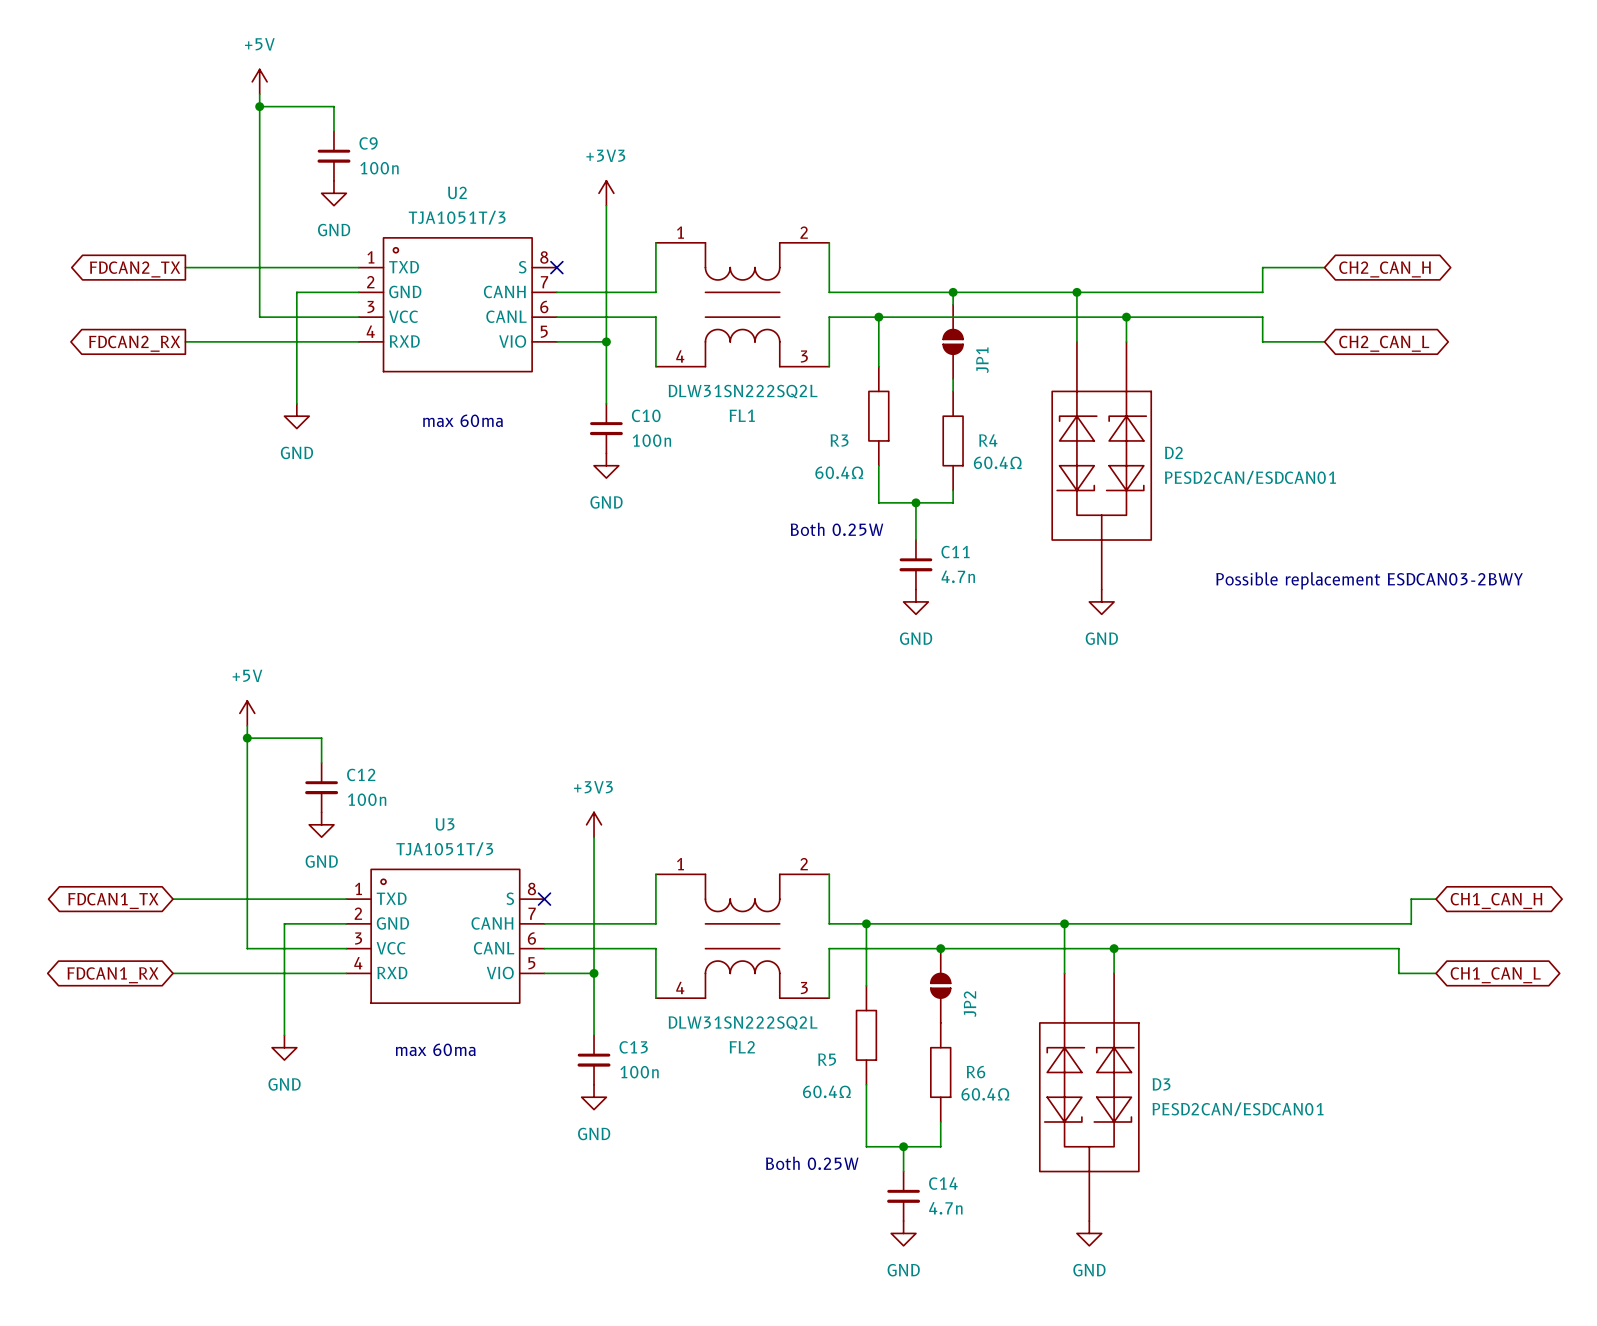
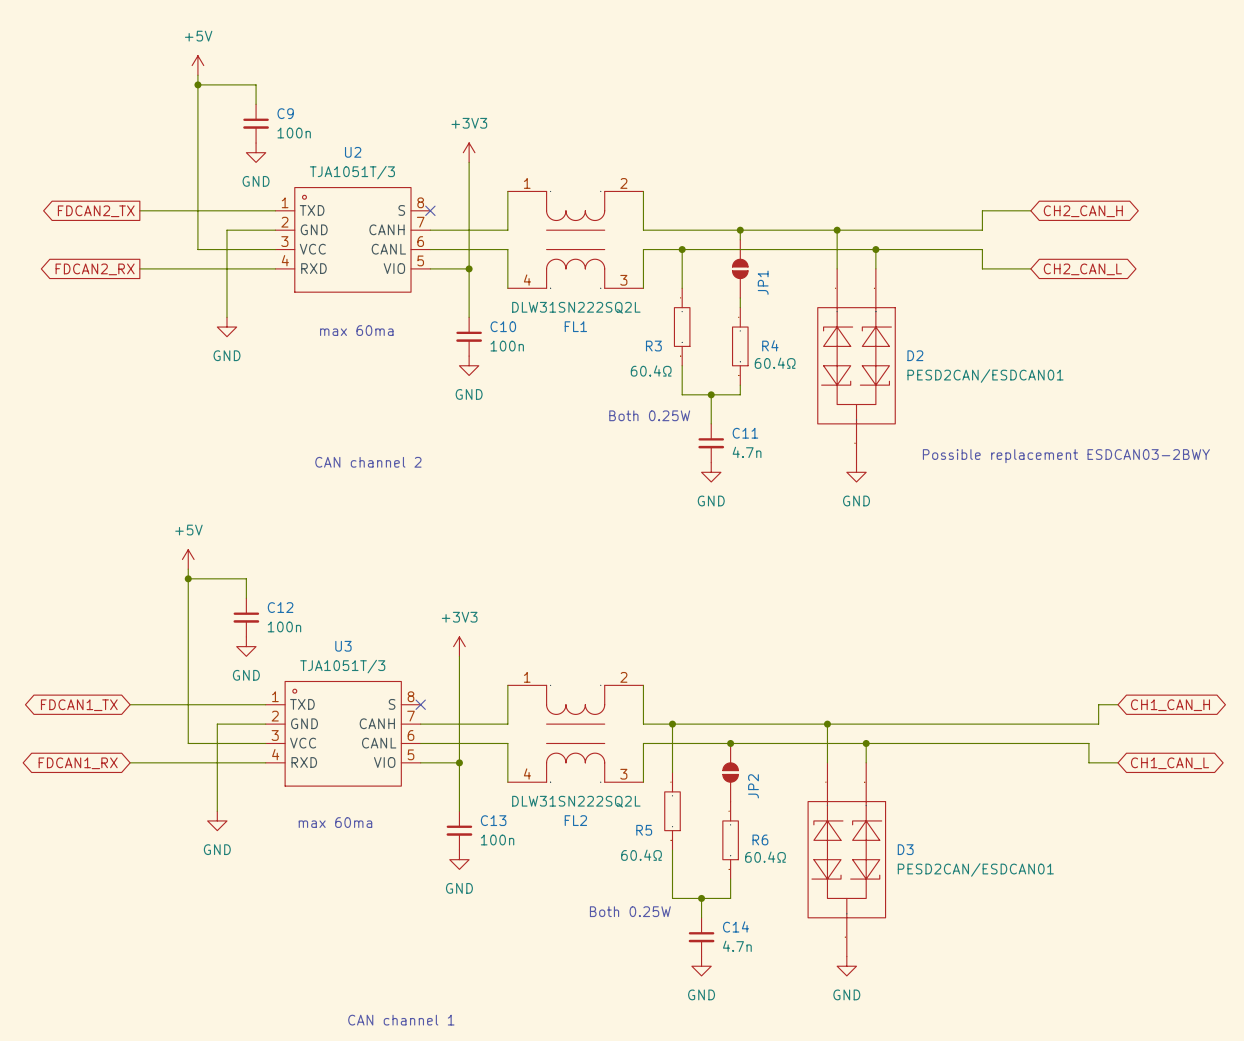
text: none -> CAN channel 2 (368, 462)
text: none -> CAN channel 1 (401, 1020)

